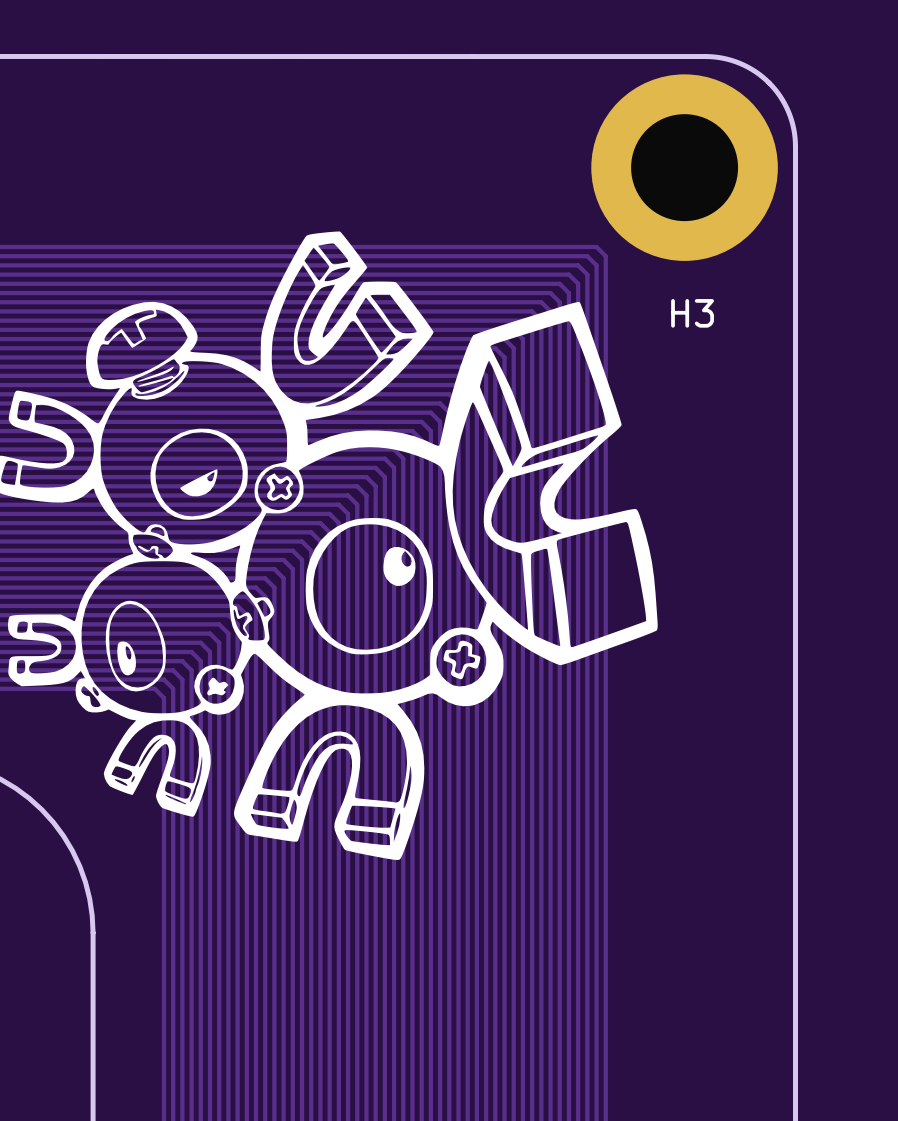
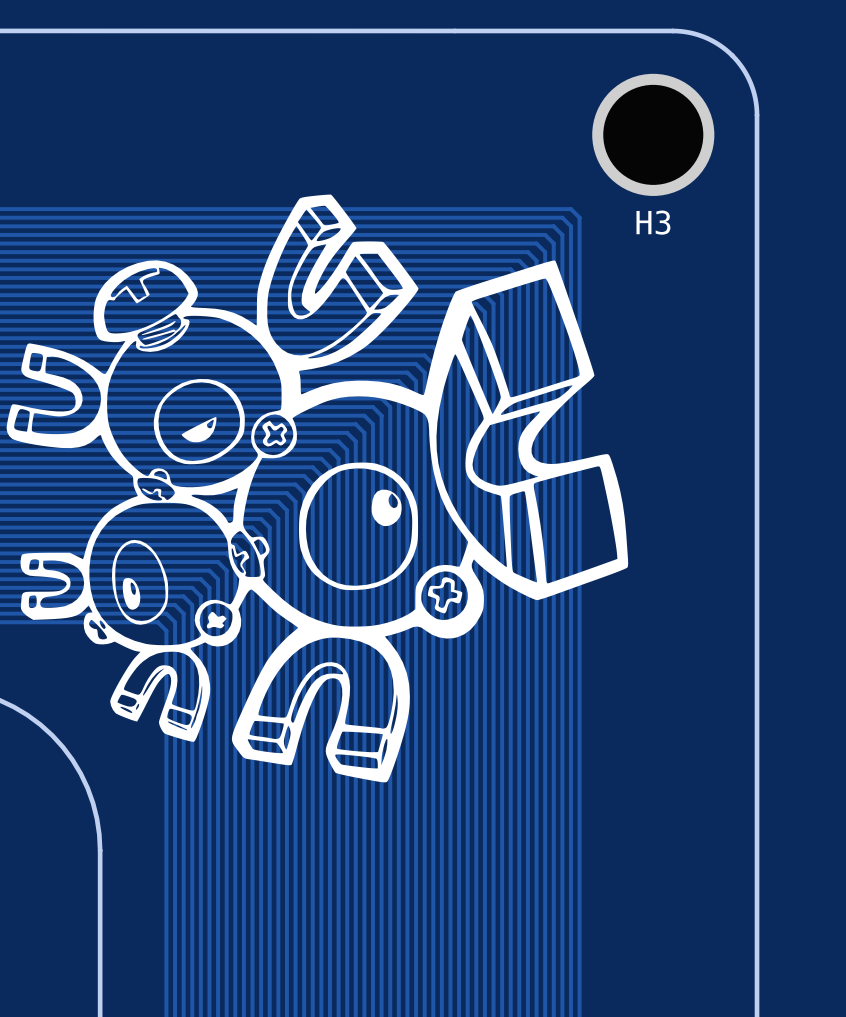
H3 footprint: [591, 74, 778, 261] -> [592, 73, 715, 196]
H3 name position: H3 (692, 313) -> H3 (653, 222)

